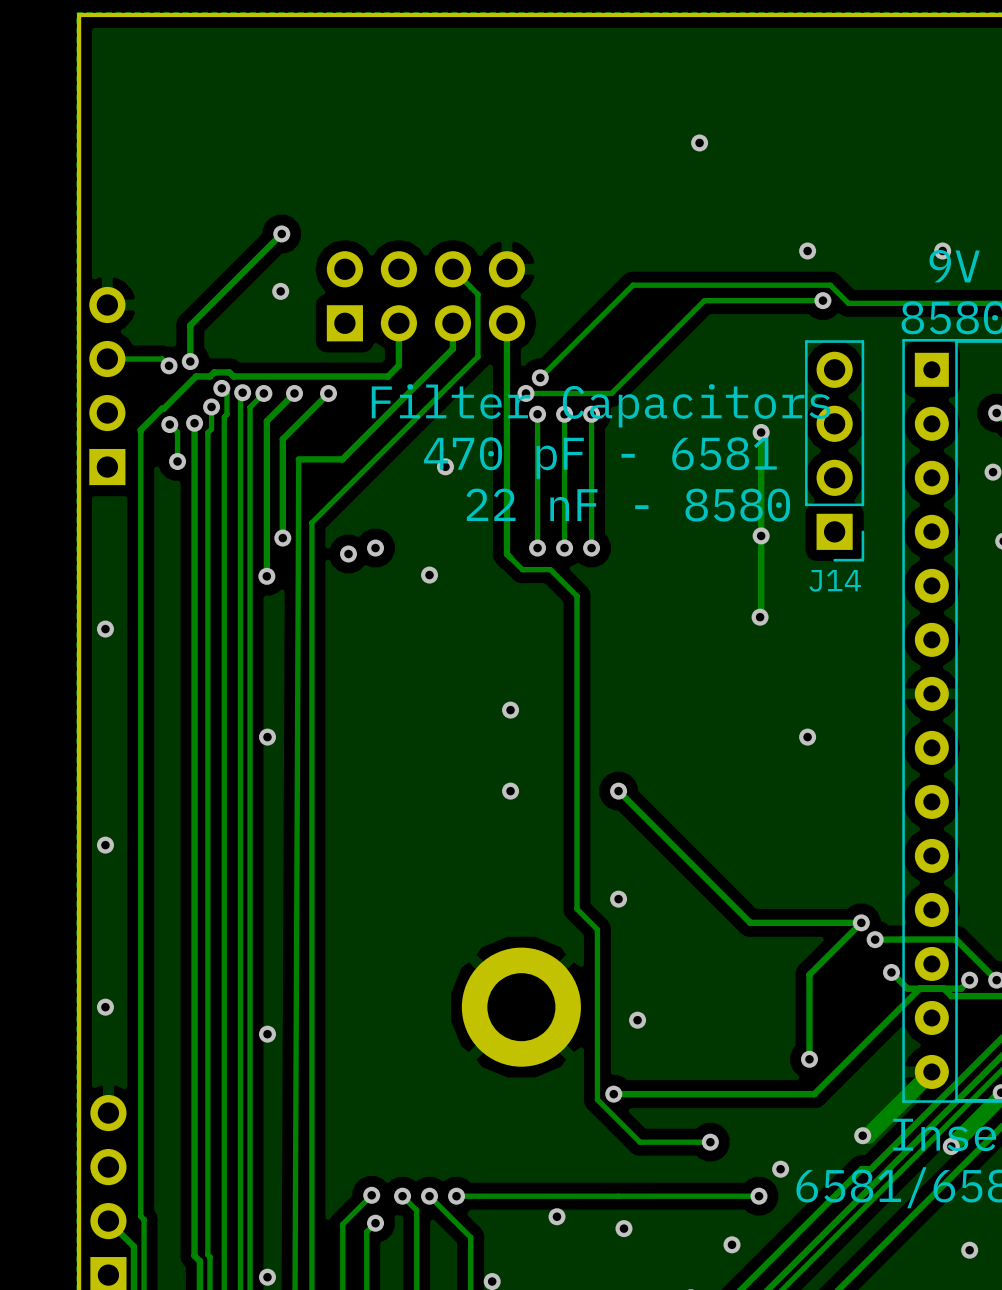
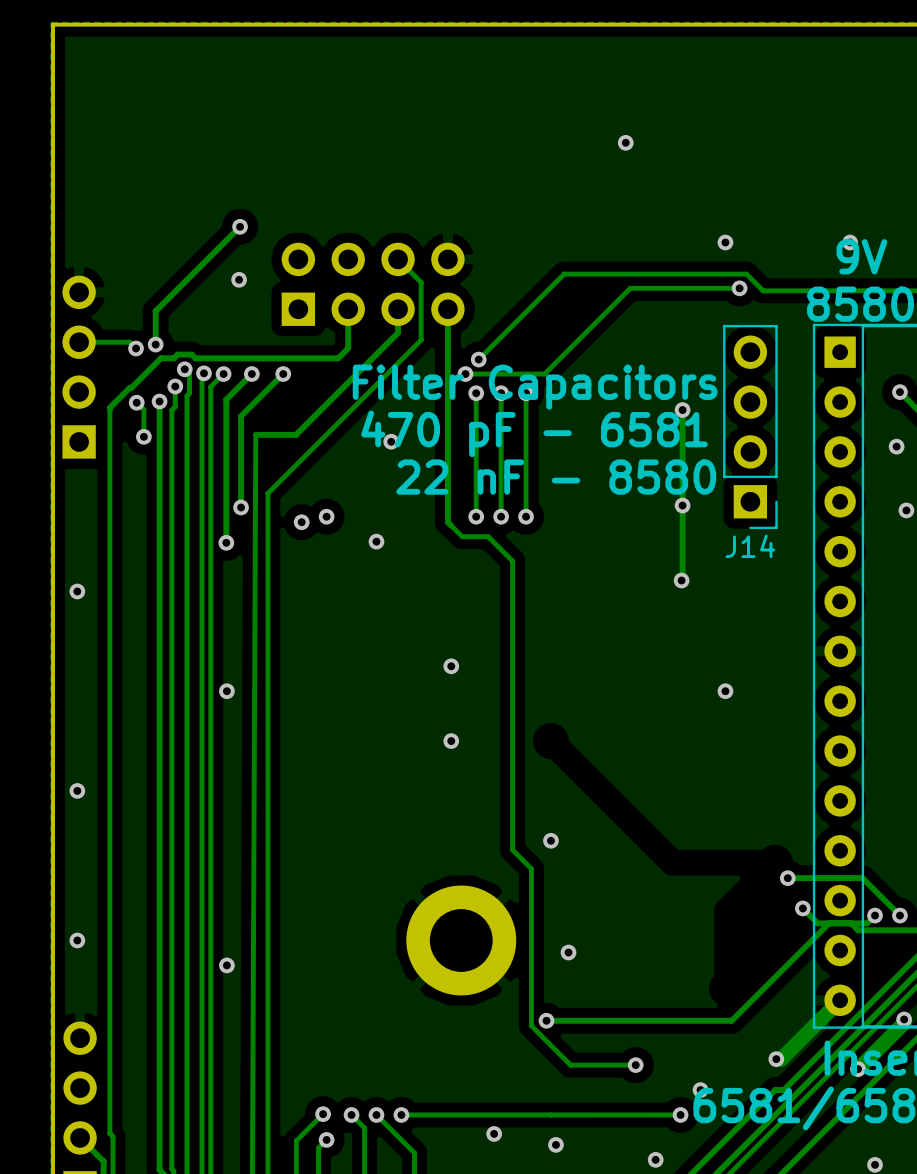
track: (618, 791) (750, 922) (861, 922) (809, 974) (809, 1059) -> none
via: (618, 791) -> none
via: (861, 922) -> none
via: (809, 1059) -> none

